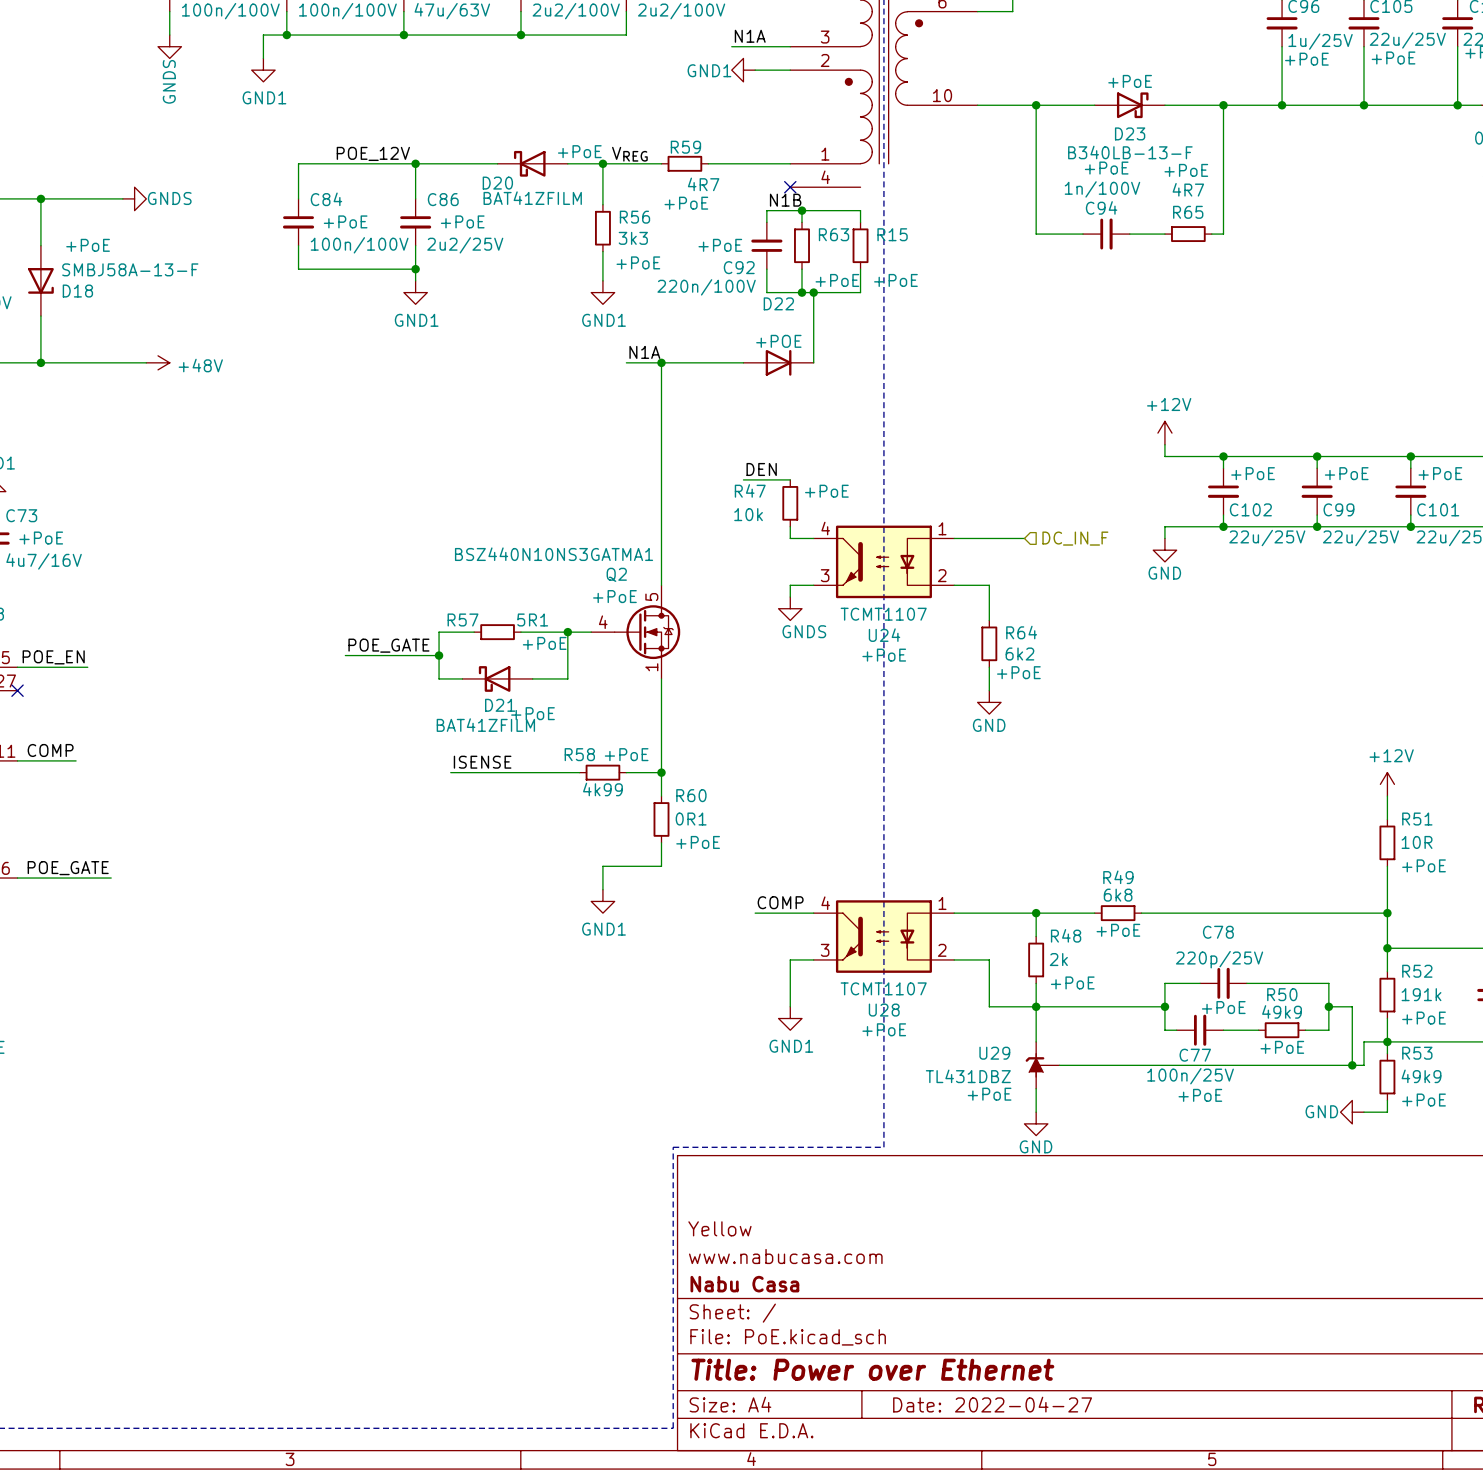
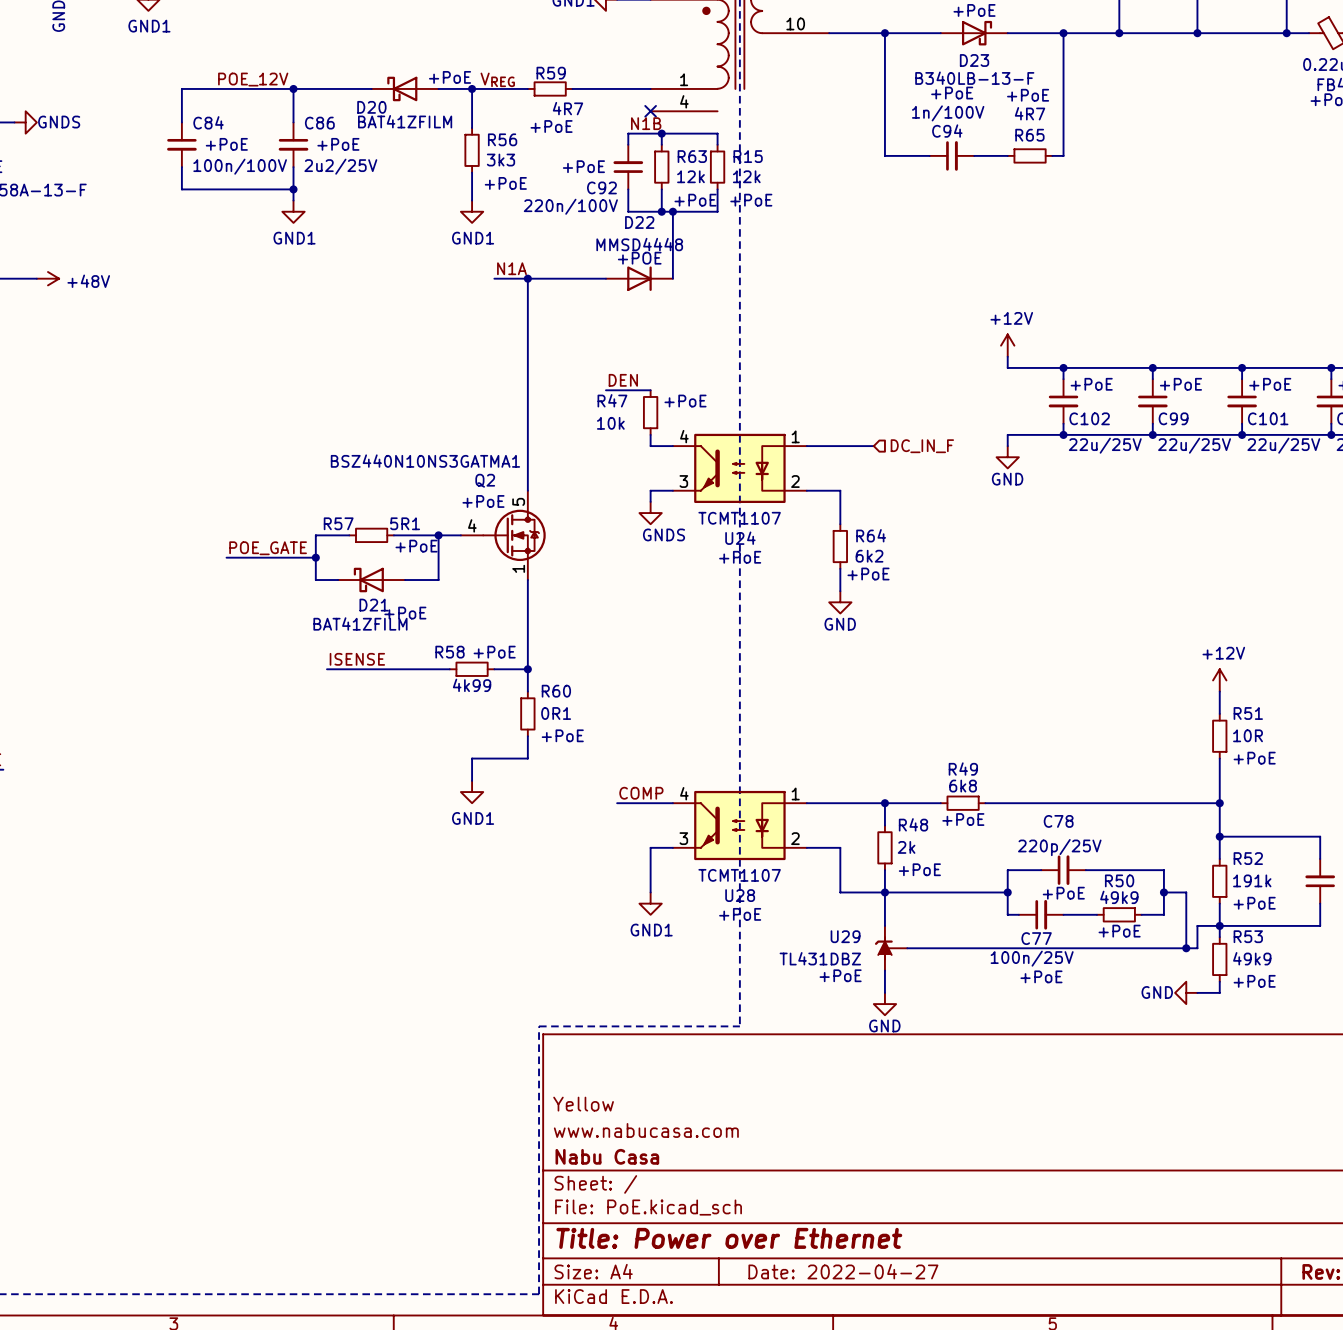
R63 value: none -> 12k (690, 176)
R15 value: none -> 12k (746, 176)
D22 value: none -> MMSD4448 (639, 244)

